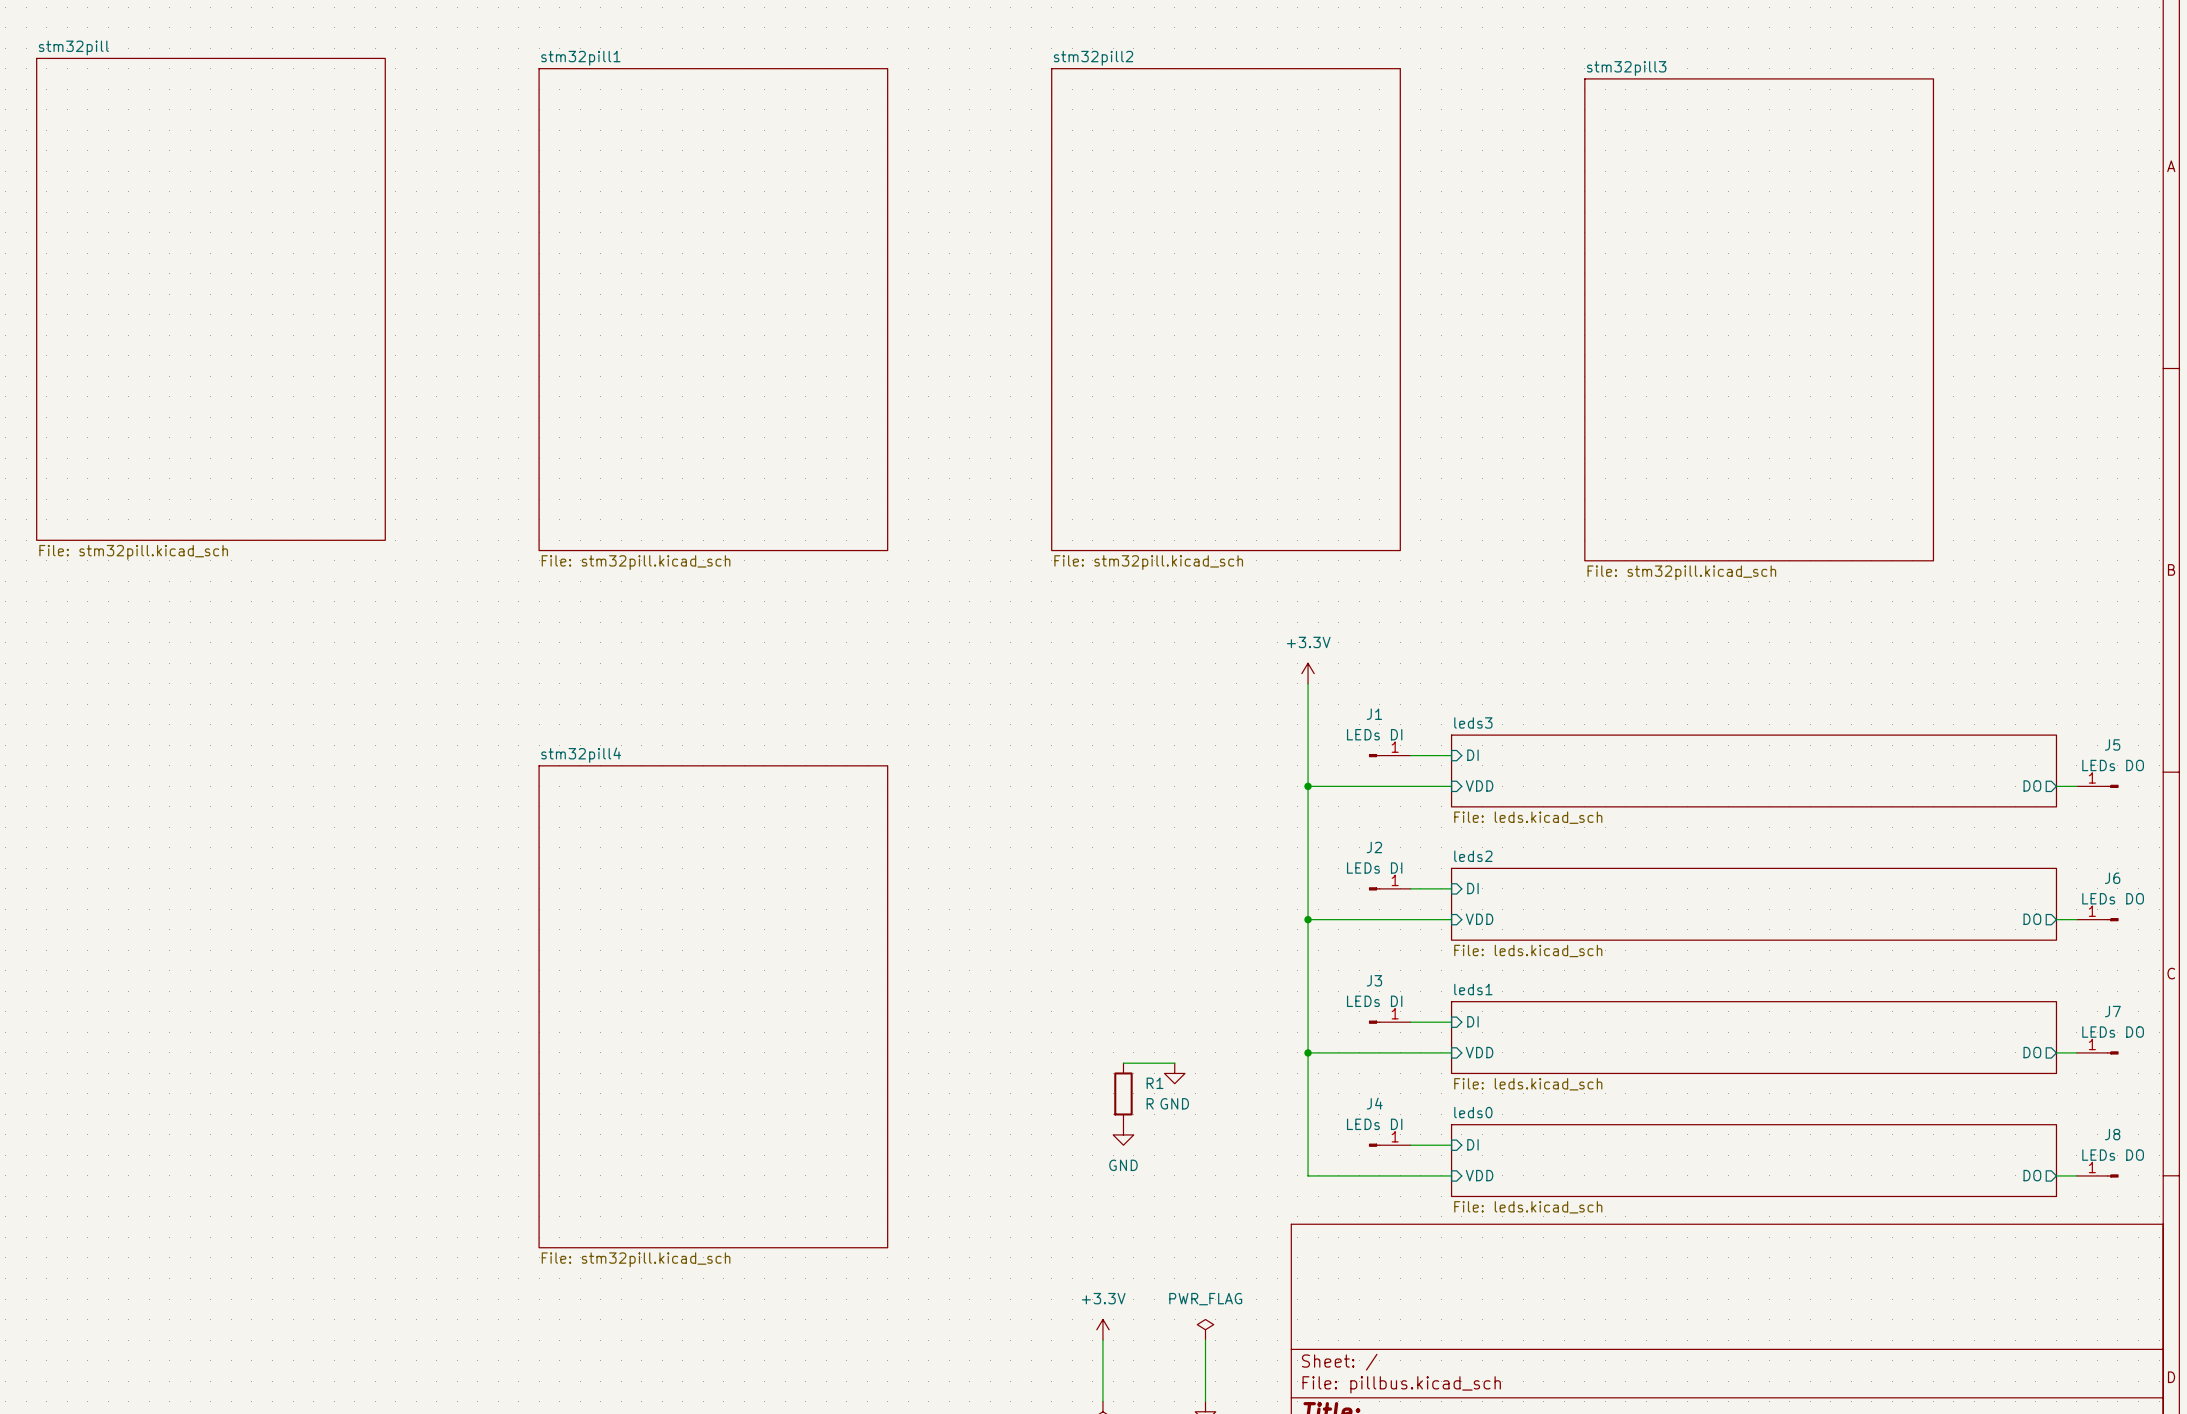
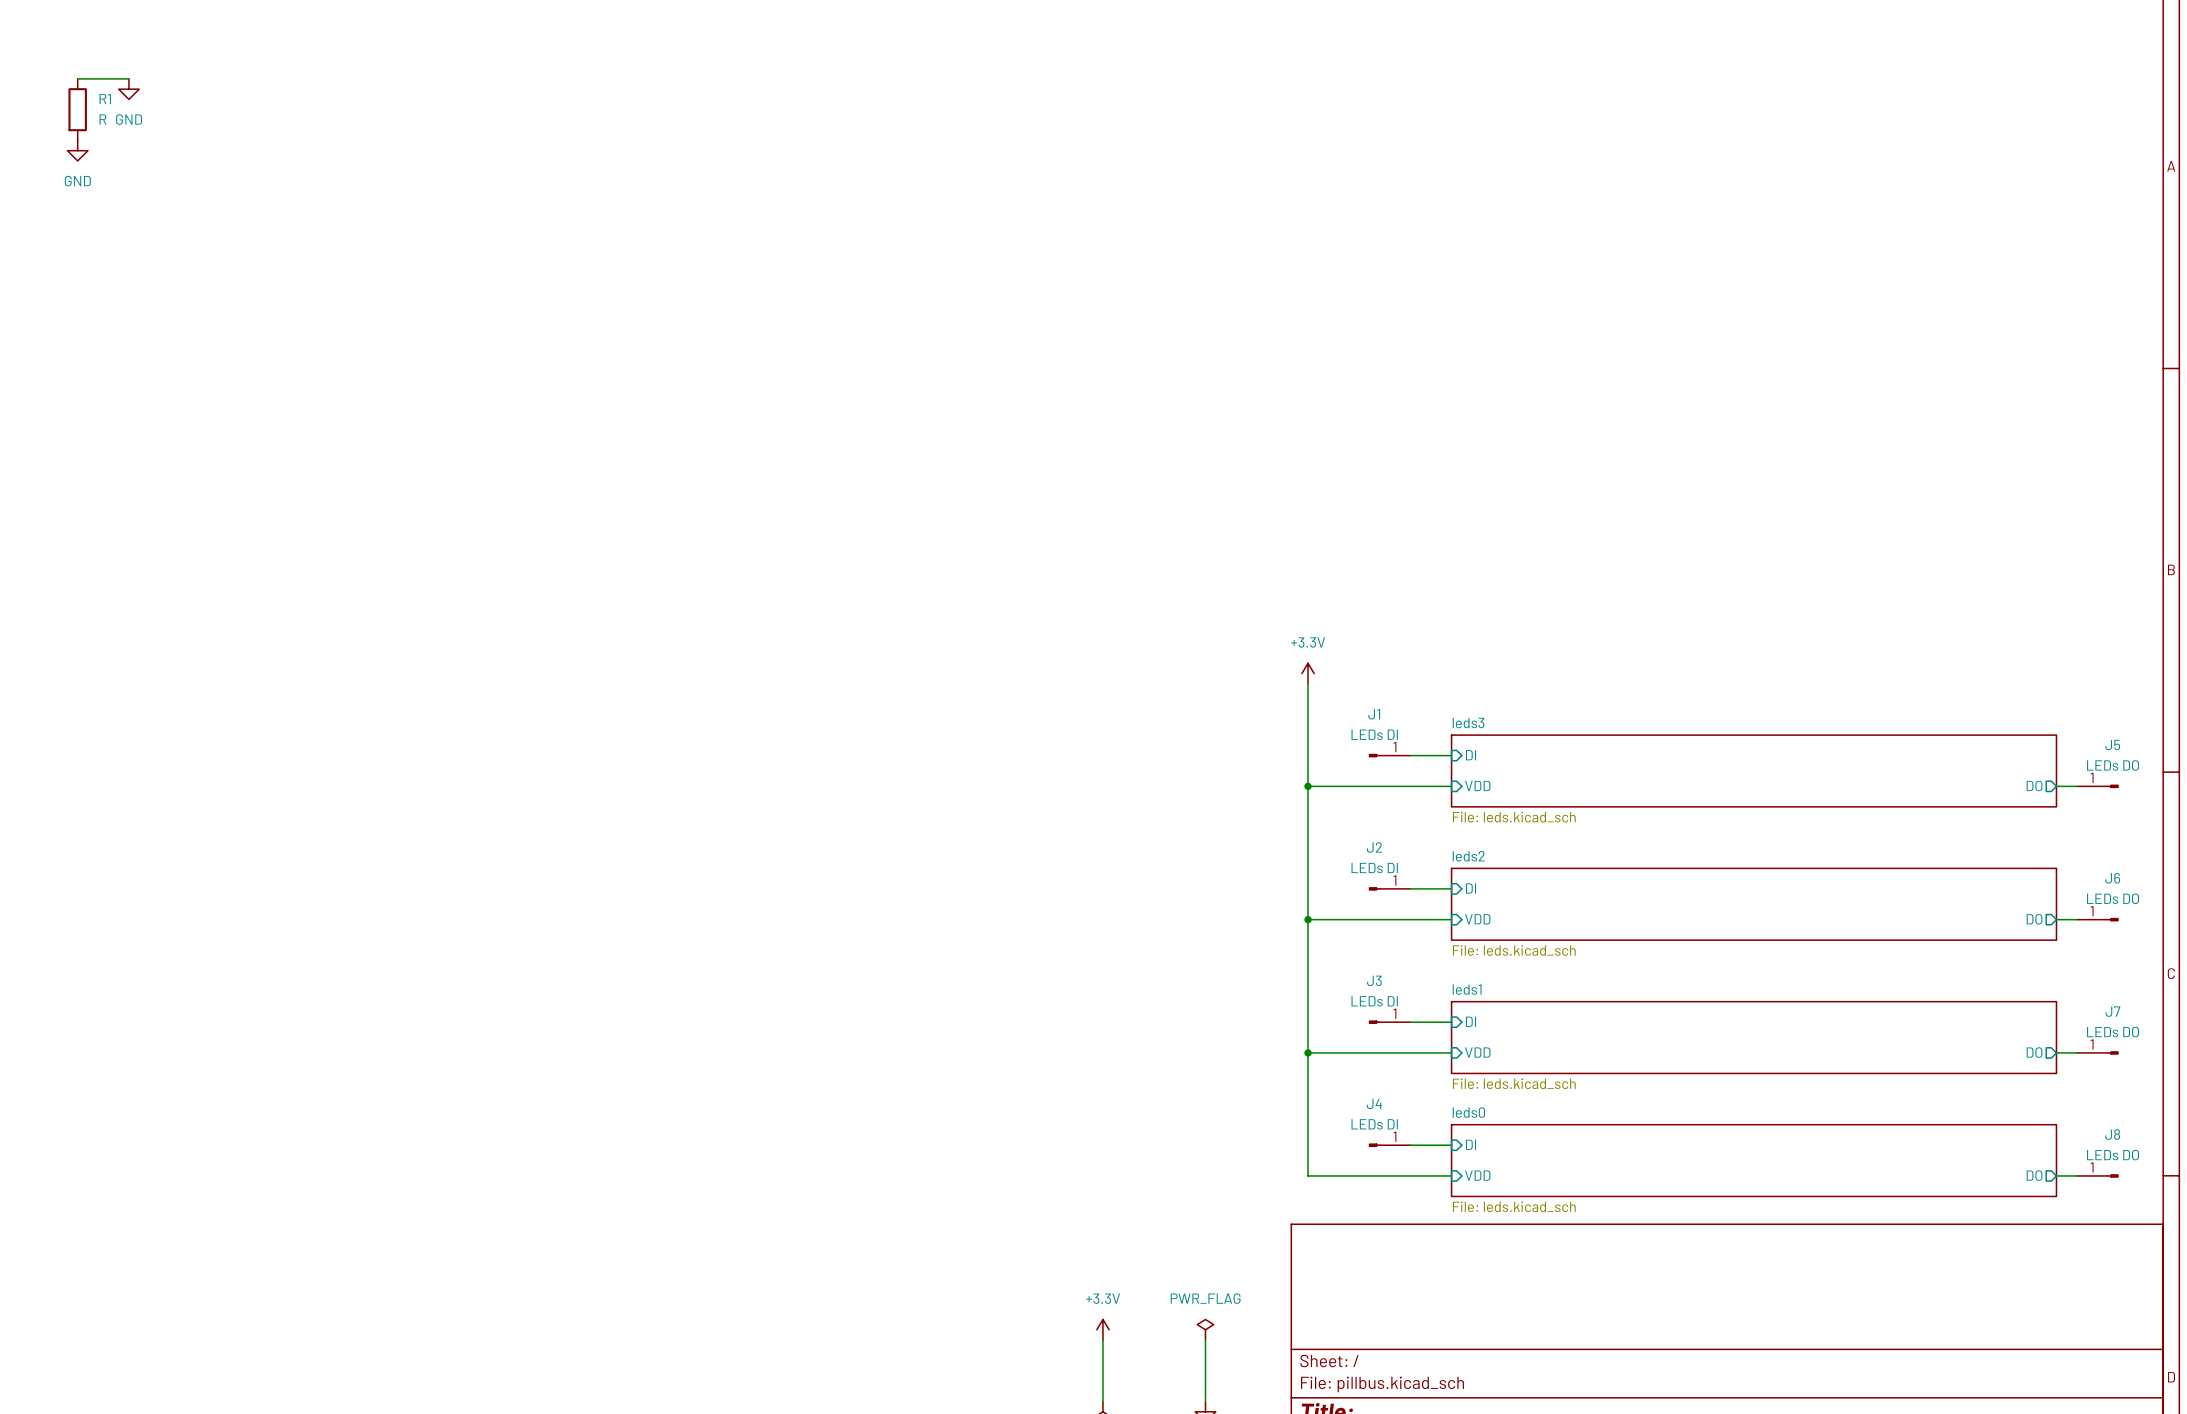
wire: none -> (77, 78) (128, 78)
power symbol: none -> GND (128, 89)
power symbol: none -> GND (77, 150)
sheet stm32pill: File: stm32pill.kicad_sch (210, 299) -> none
sheet stm32pill1: File: stm32pill.kicad_sch (713, 309) -> none
sheet stm32pill2: File: stm32pill.kicad_sch (1226, 309) -> none
sheet stm32pill3: File: stm32pill.kicad_sch (1759, 319) -> none
sheet stm32pill4: File: stm32pill.kicad_sch (713, 1006) -> none
wire: (1123, 1063) (1174, 1063) -> none
power symbol: GND (1174, 1073) -> none
R1 position: (1123, 1093) -> (77, 109)
power symbol: GND (1123, 1134) -> none

